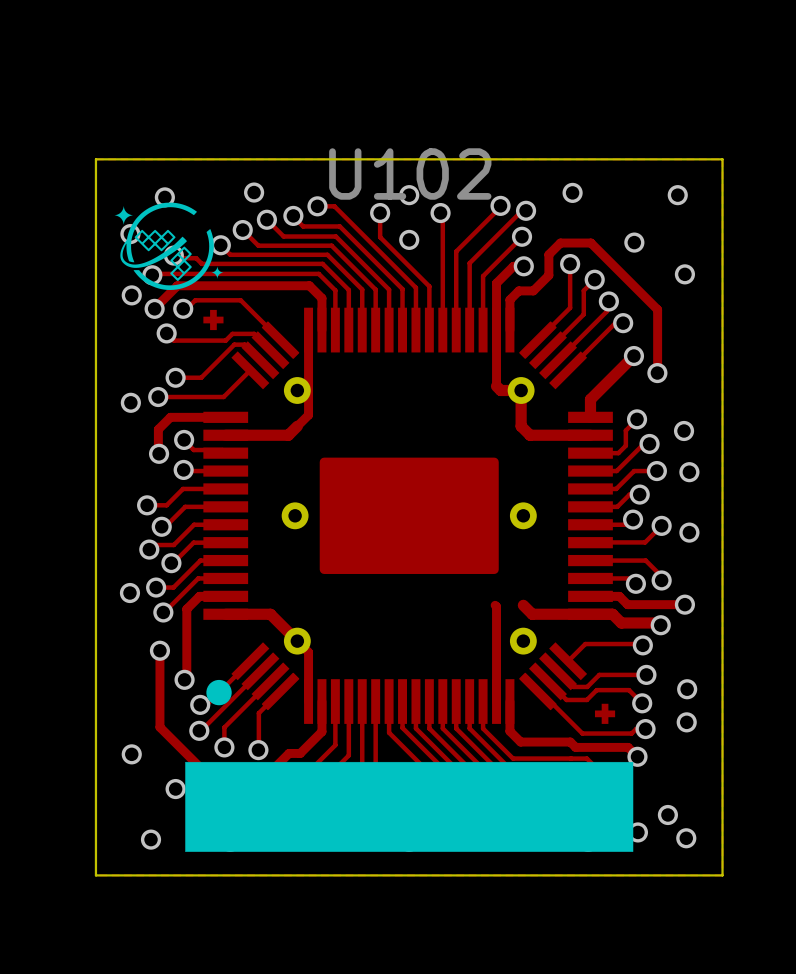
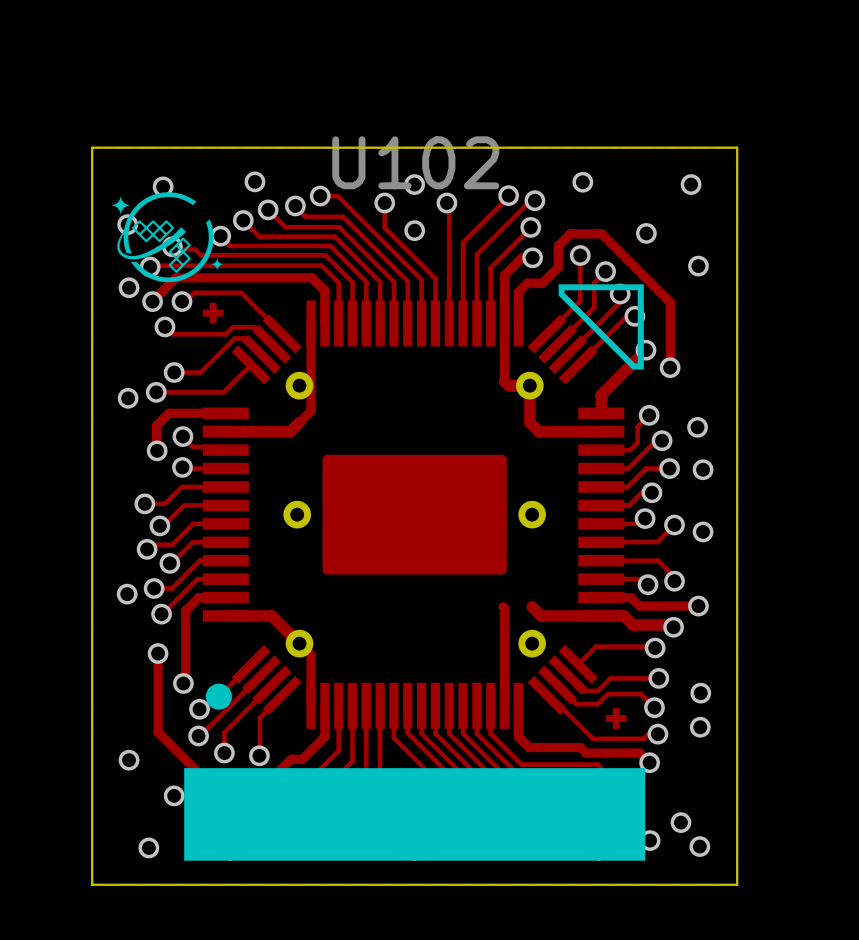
drawing: none -> [558, 284, 644, 370]

